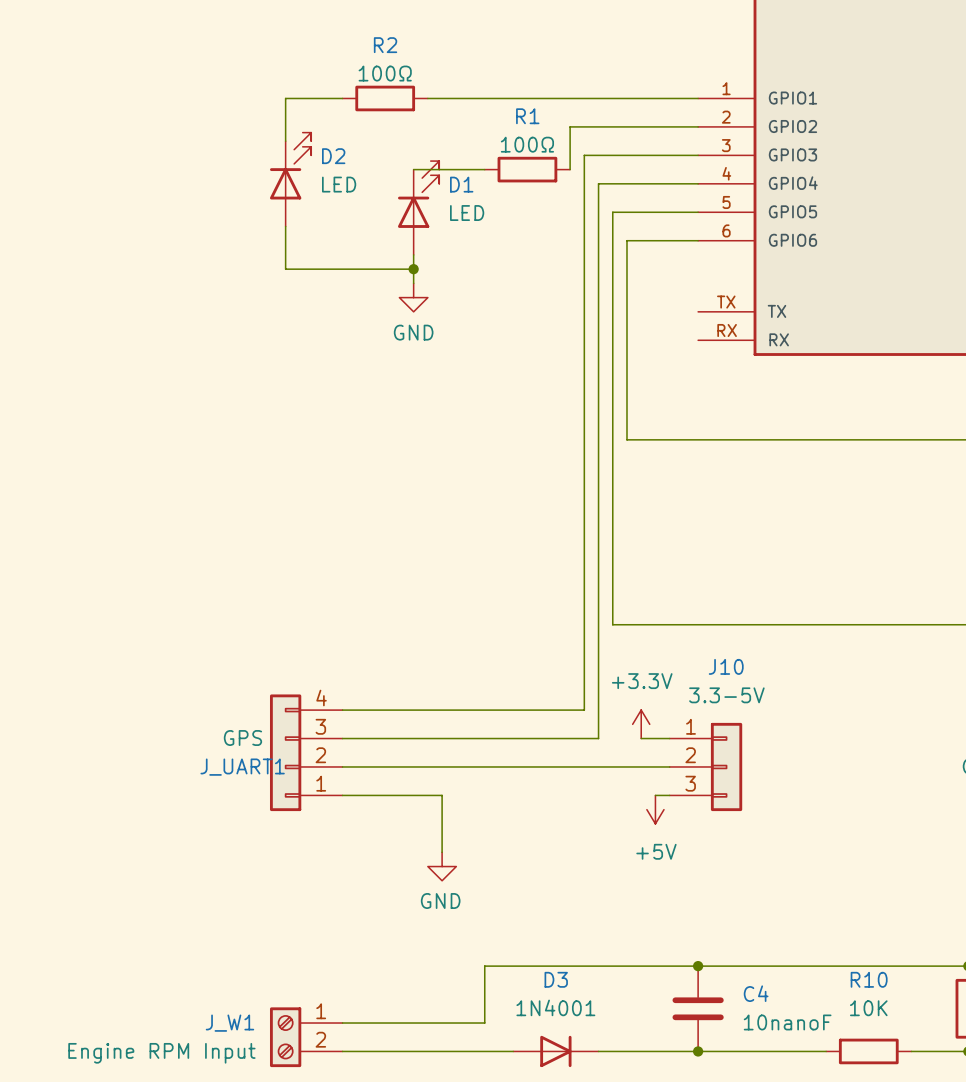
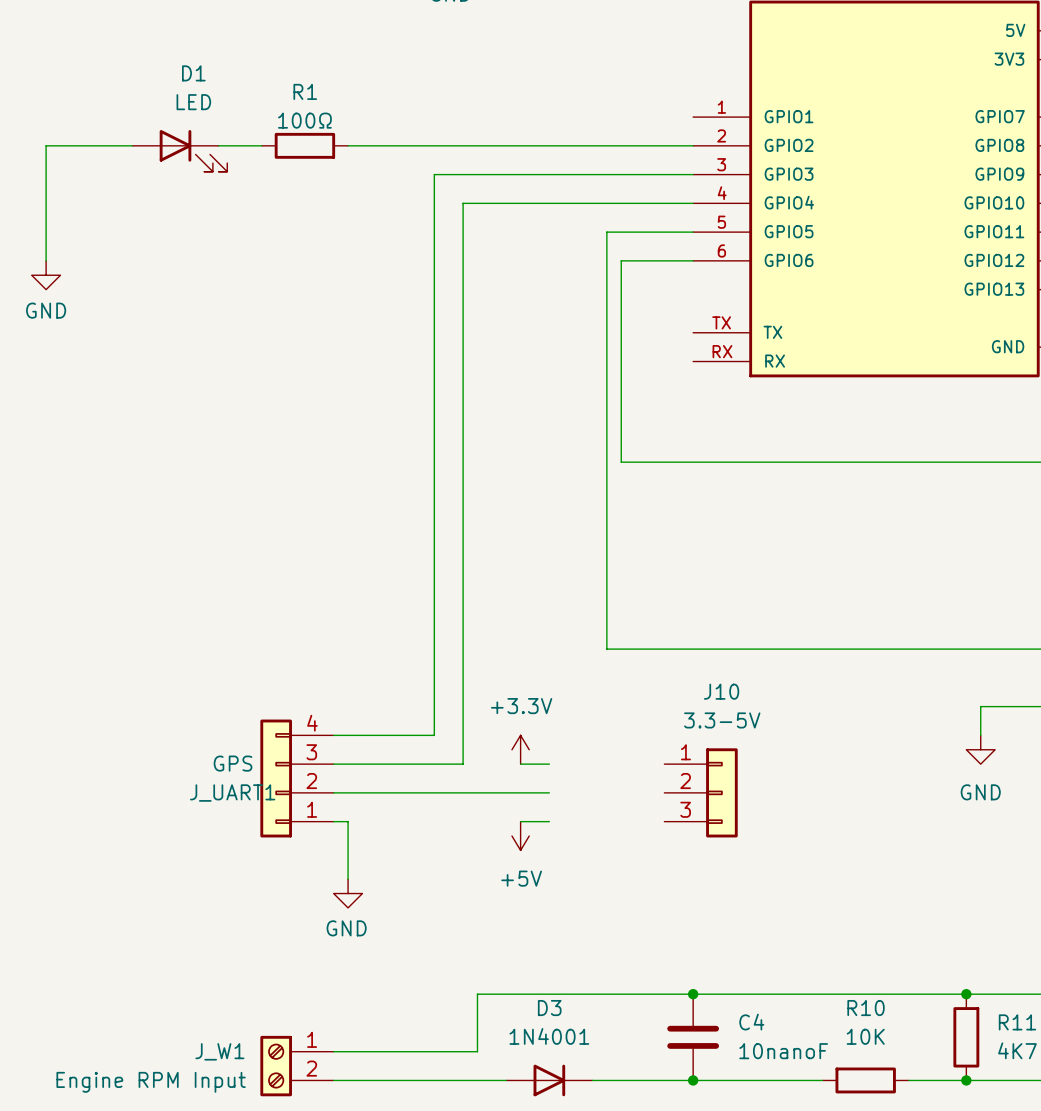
wire: (342, 98) (285, 98) (285, 141) -> none
R2: 100Ω (385, 98) -> none
wire: (427, 98) (698, 98) -> none
wire: none -> (132, 145) (46, 145) (46, 260)
wire: none -> (218, 145) (261, 145)
wire: (570, 126) (570, 169) -> (563, 145) (348, 145)
wire: (584, 155) (584, 710) (442, 710) -> (578, 174) (434, 174) (434, 735)
wire: (413, 169) (484, 169) -> none
R1 position: (527, 169) -> (304, 145)
D2: LED (290, 179) -> none
wire: (598, 183) (598, 738) (555, 738) -> (592, 203) (463, 203) (463, 764)
D1 name position: D1 (461, 184) -> D1 (193, 73)
D1 rotation: 0° (418, 194) -> 90° clockwise (193, 150)
D1 position: (418, 208) -> (179, 150)
D1 value position: LED (467, 213) -> LED (193, 102)
wire: (285, 226) (285, 269) (413, 269) -> none
power symbol: none -> GND (46, 275)
wire: (413, 254) (413, 283) -> none
junction: (413, 269) -> none
power symbol: GND (413, 297) -> none
power symbol position: +3.3V (641, 724) -> +3.3V (520, 749)
wire: (470, 738) (527, 738) -> none
wire: (641, 738) (669, 738) -> (520, 821) (549, 821)
wire: (555, 766) (669, 766) -> none
wire: (356, 795) (442, 795) (442, 852) -> (348, 821) (348, 879)
wire: (655, 795) (669, 795) -> none
power symbol position: +5V (655, 809) -> +5V (520, 836)
power symbol position: GND (442, 866) -> GND (348, 893)

